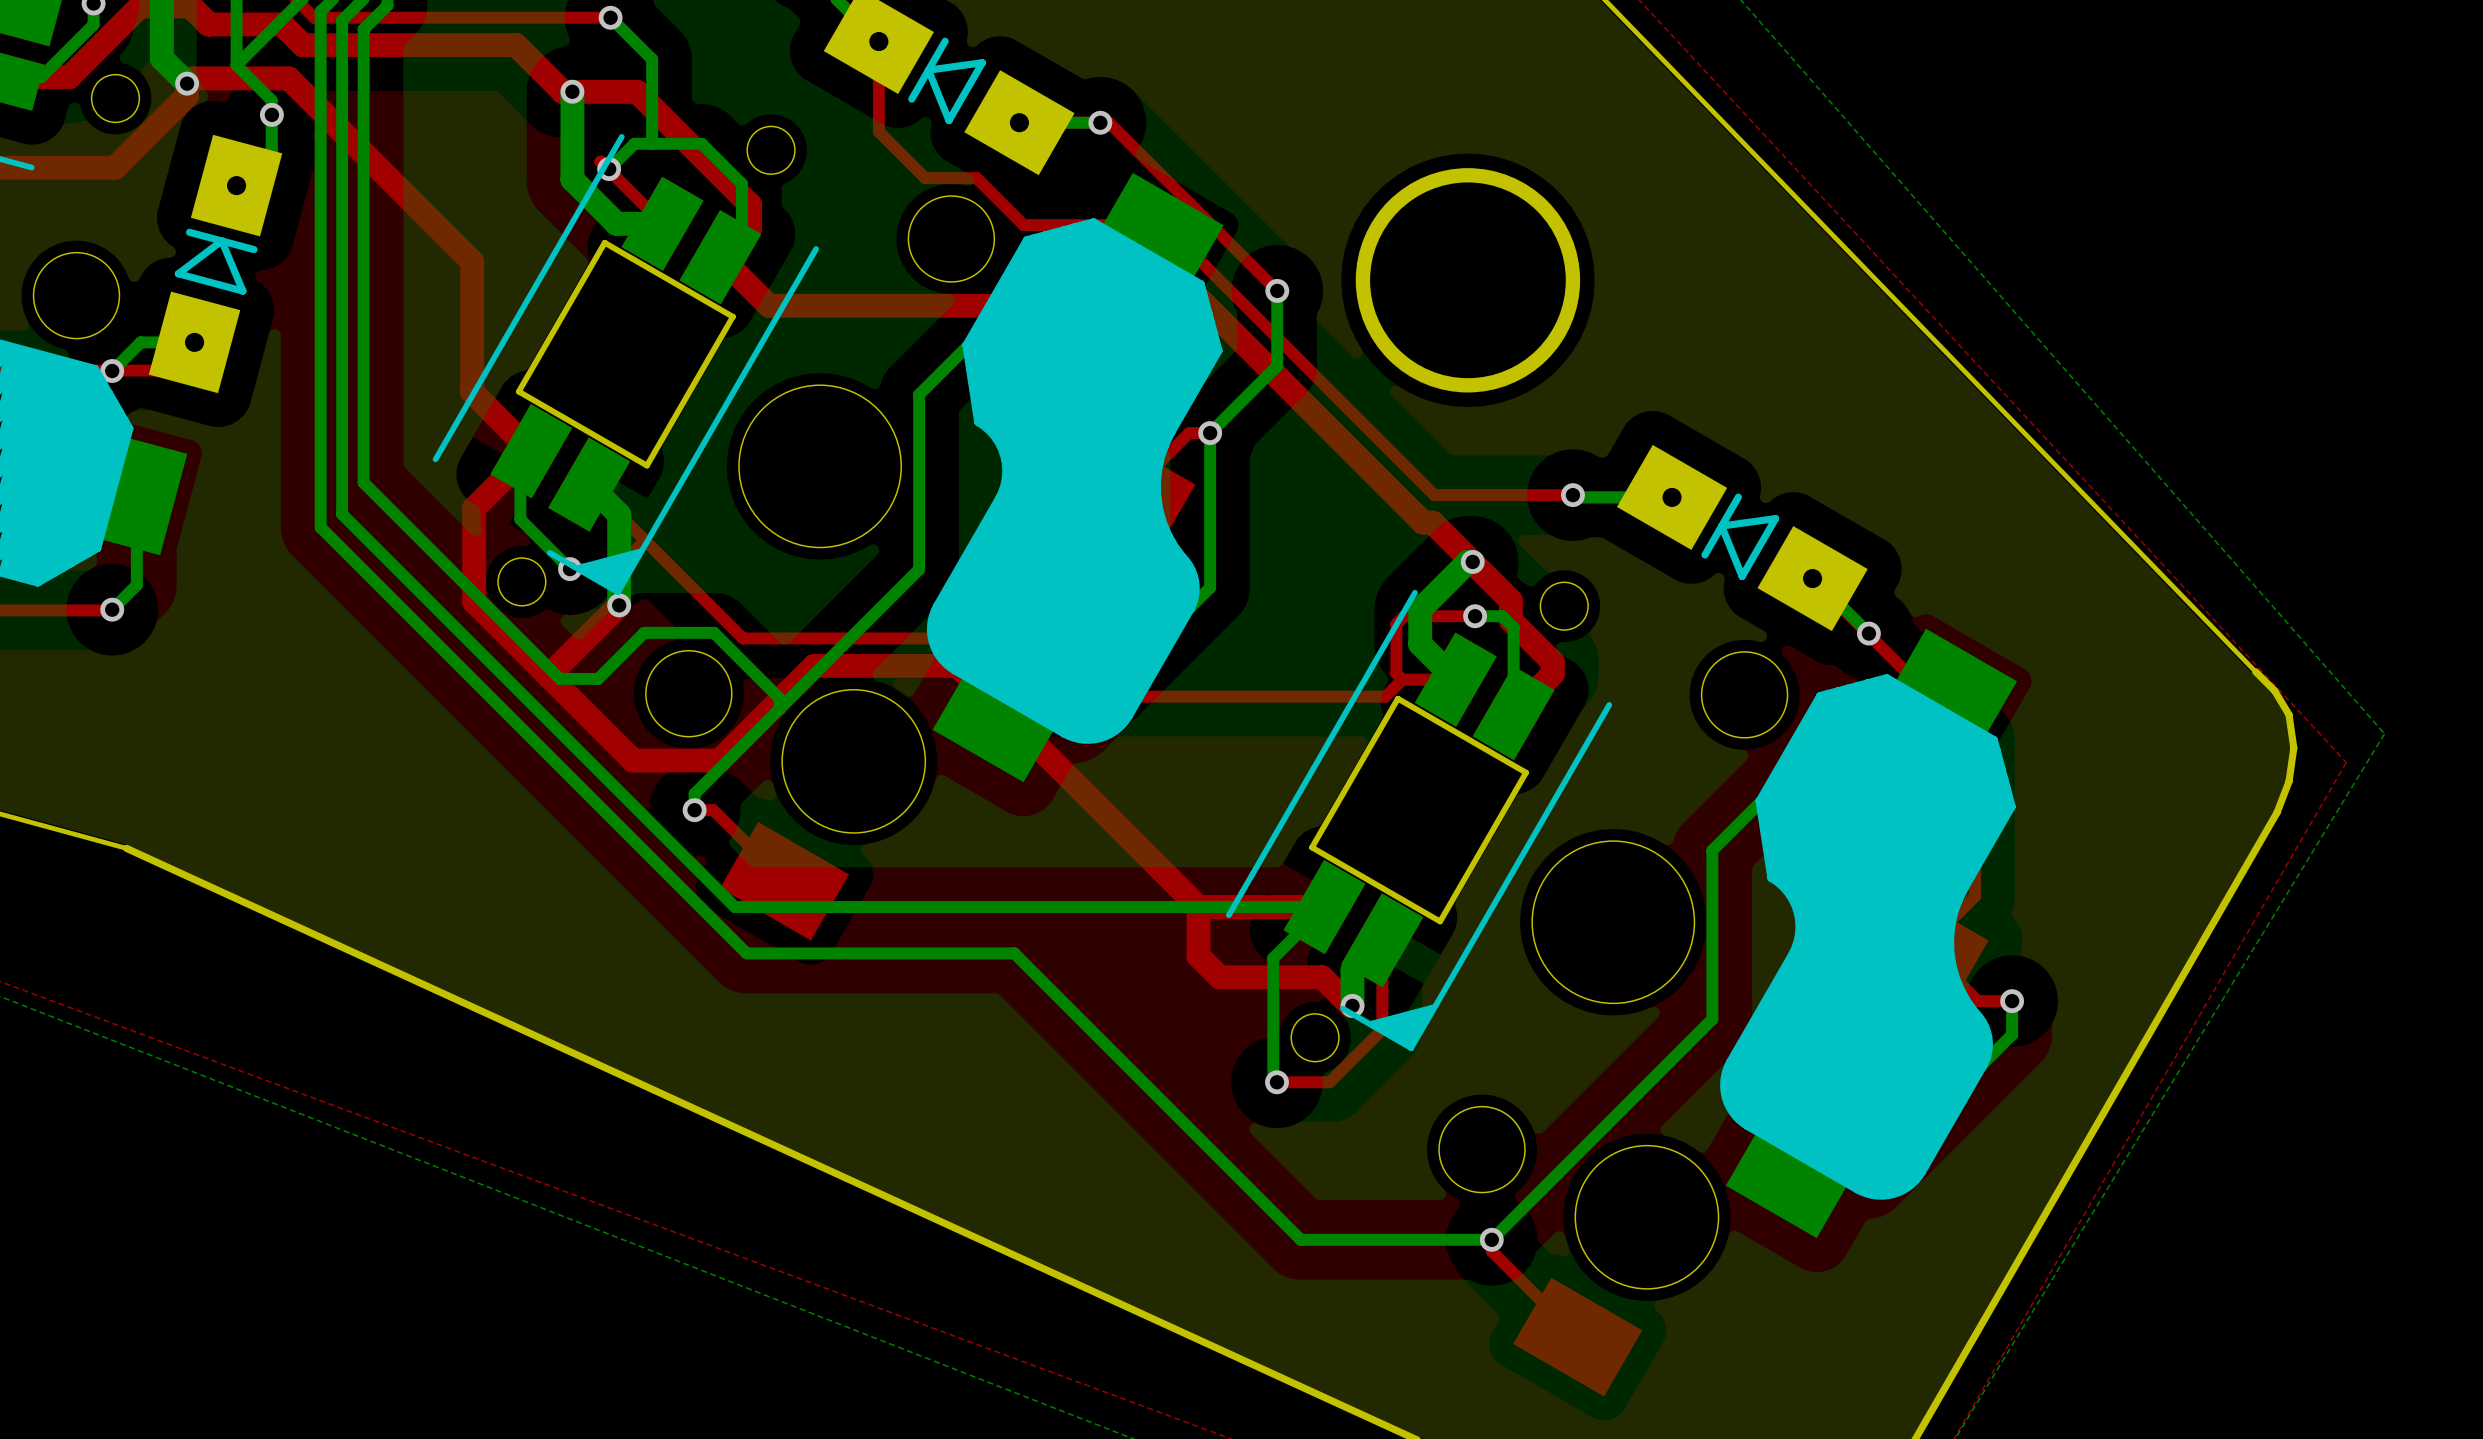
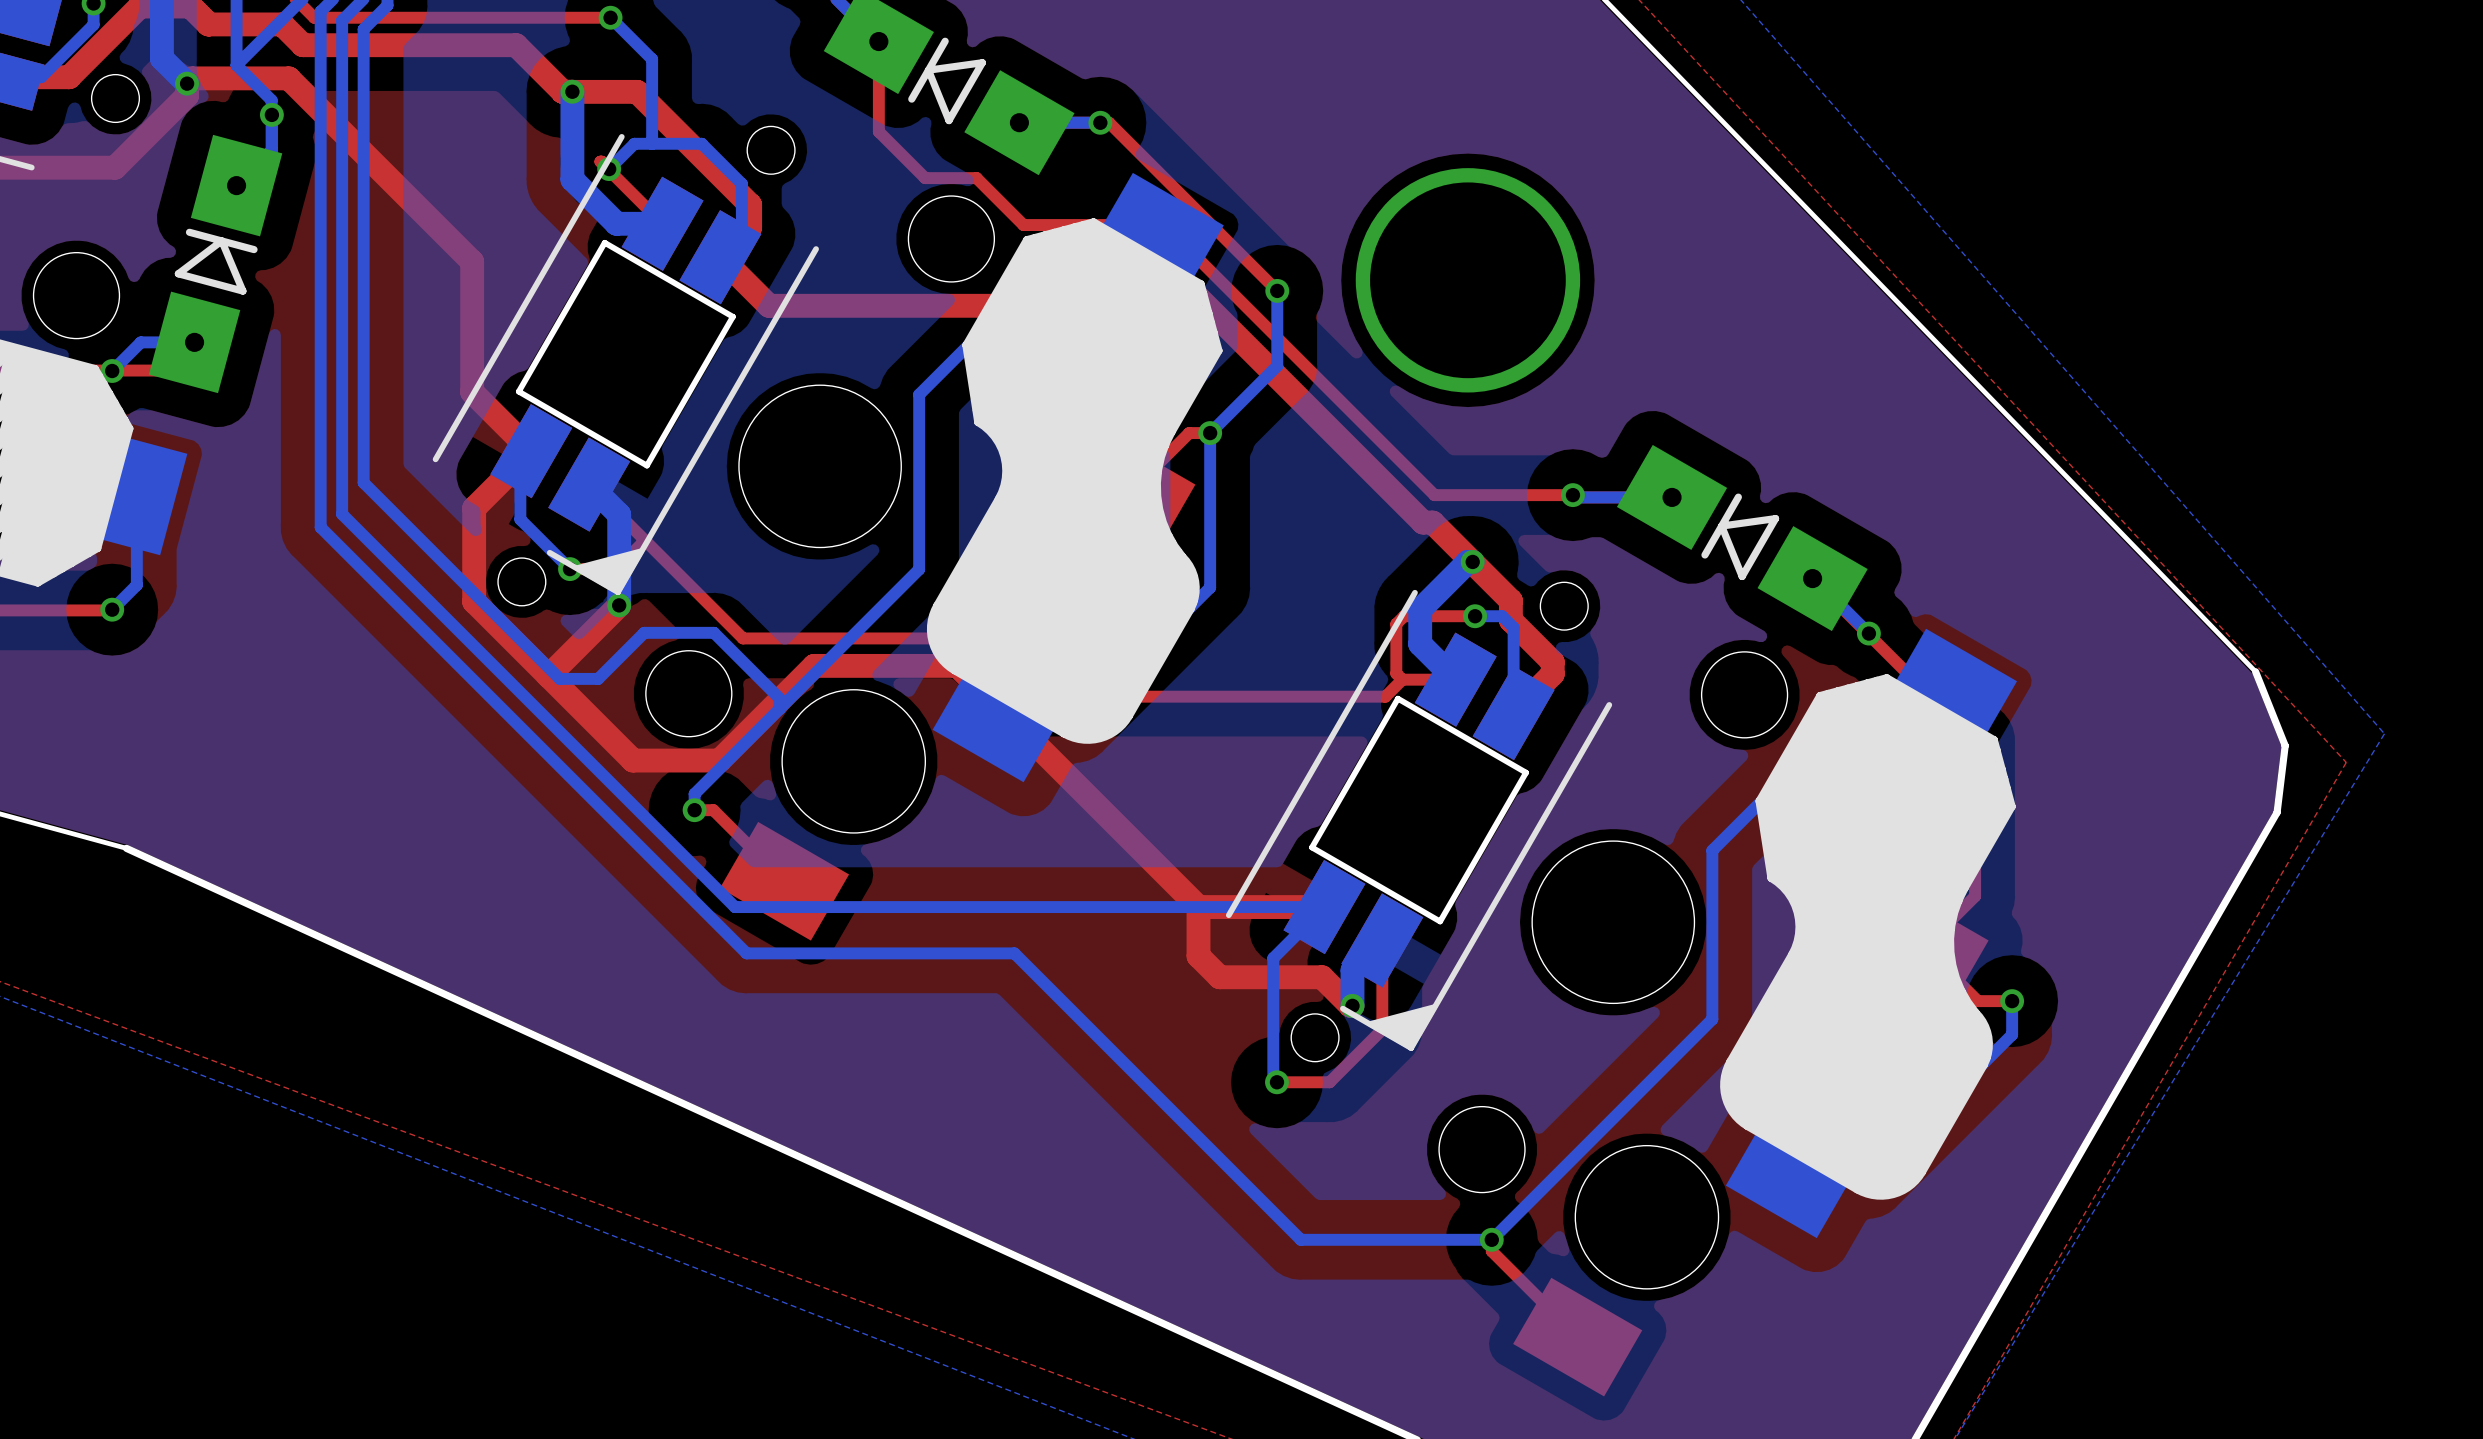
board edge: (2255, 671) (2274, 690) (2289, 714) (2293, 748) (2289, 781) (2277, 812) -> (2255, 671) (2285, 745) (2277, 812)

